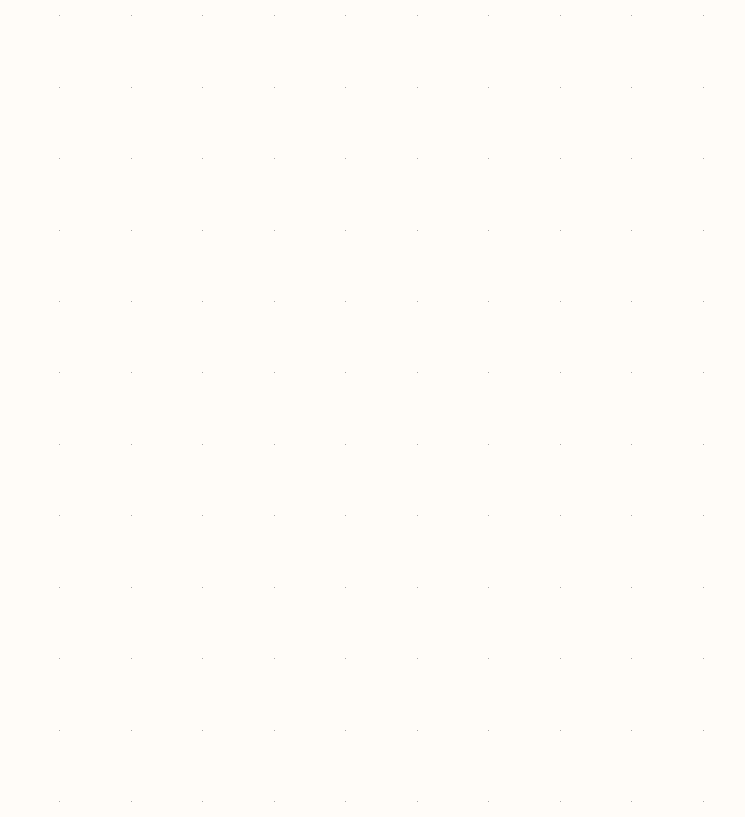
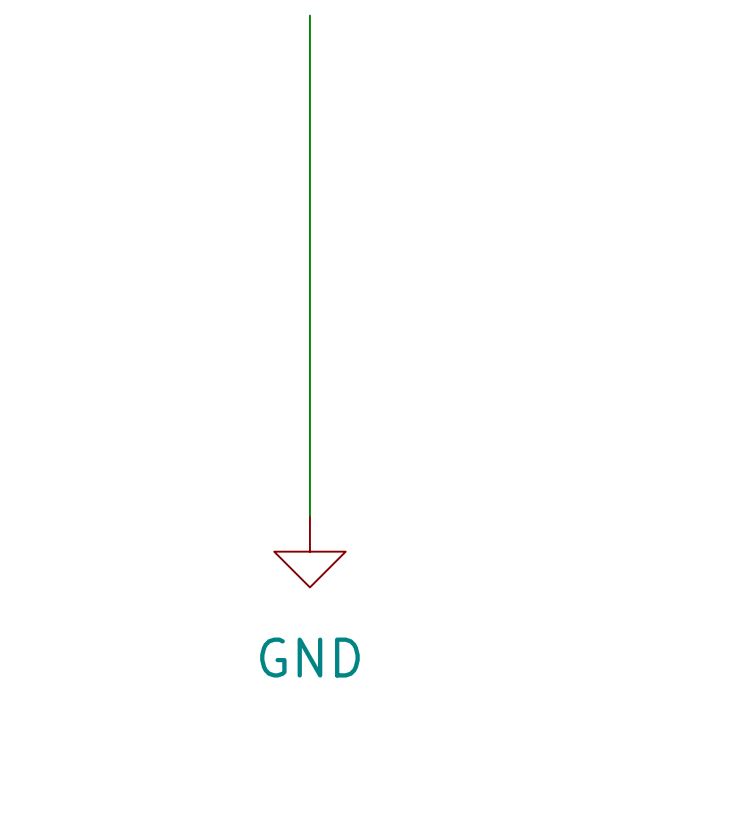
wire: none -> (309, 15) (309, 515)
power symbol: none -> GND (309, 551)

